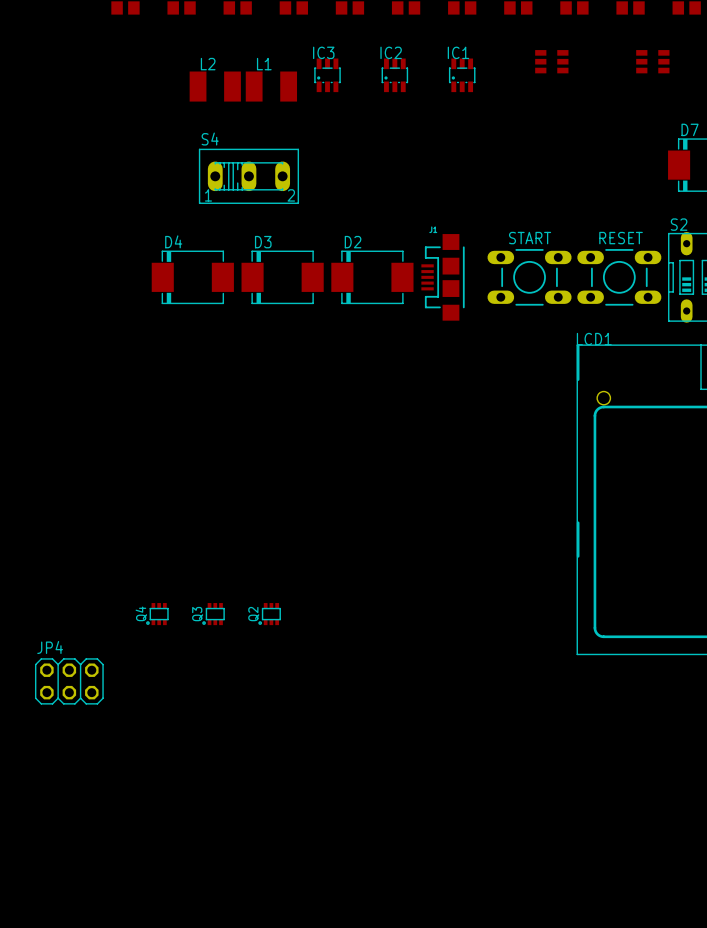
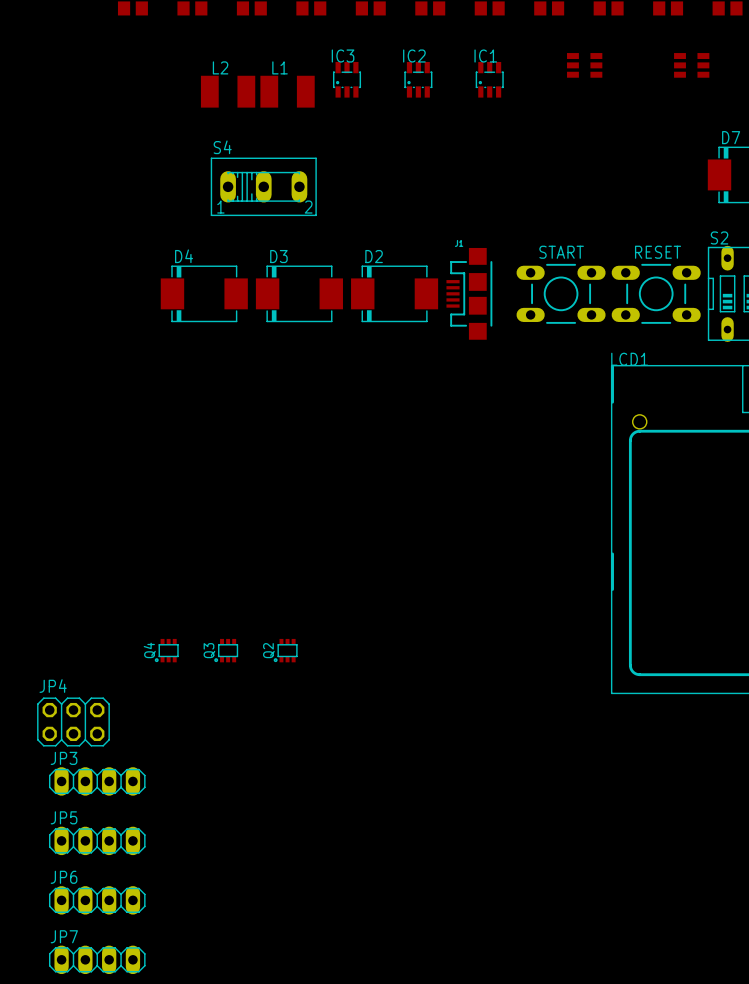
JP3: none -> (97, 781)
JP5: none -> (97, 840)
JP6: none -> (97, 900)
JP7: none -> (97, 959)

